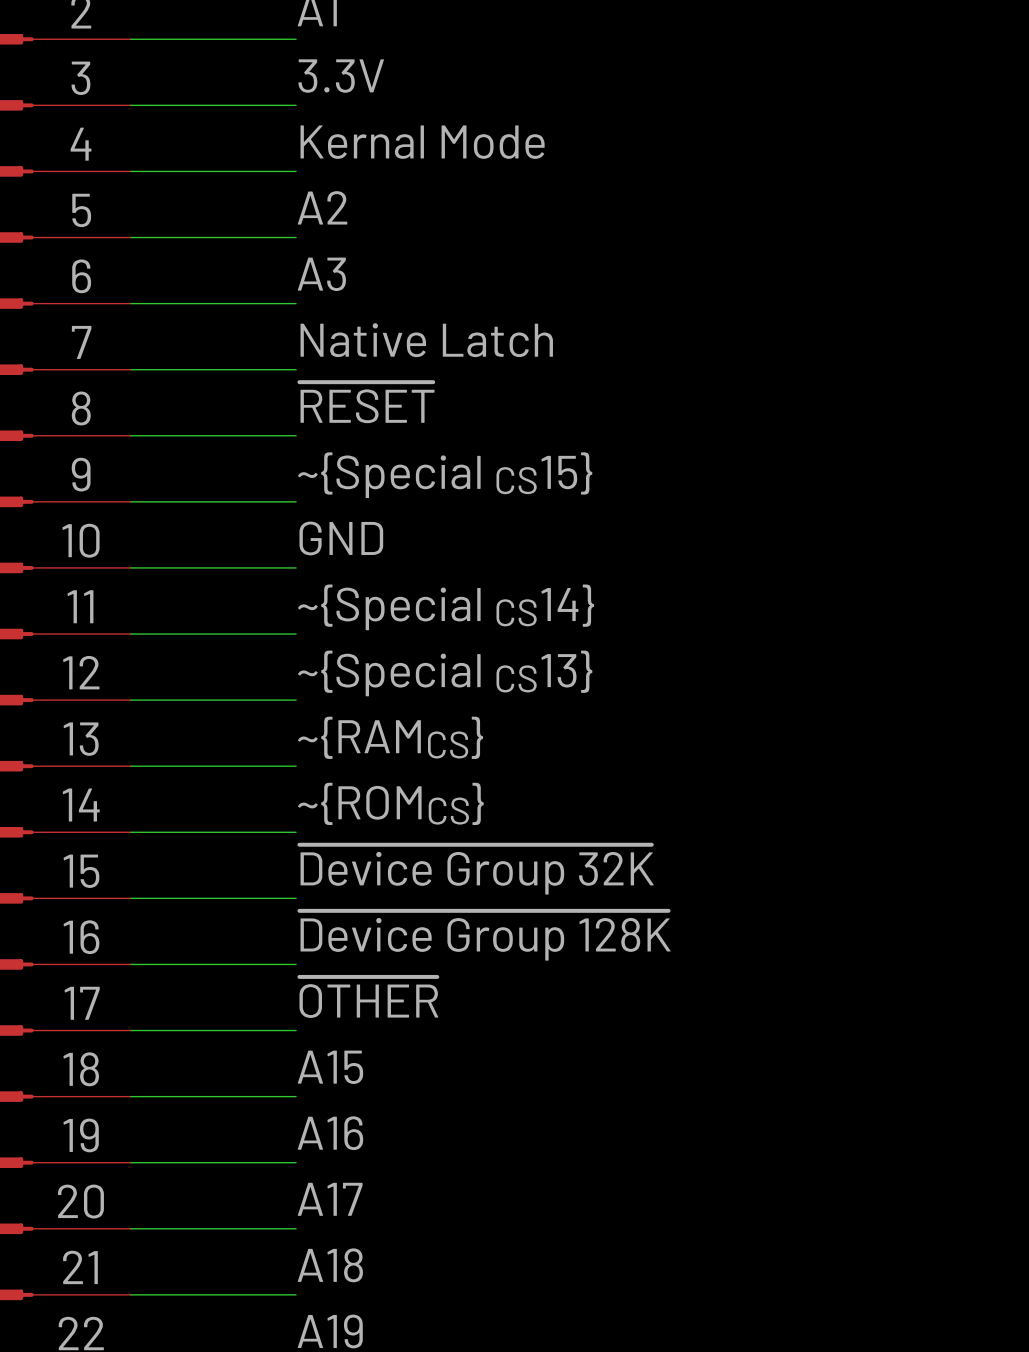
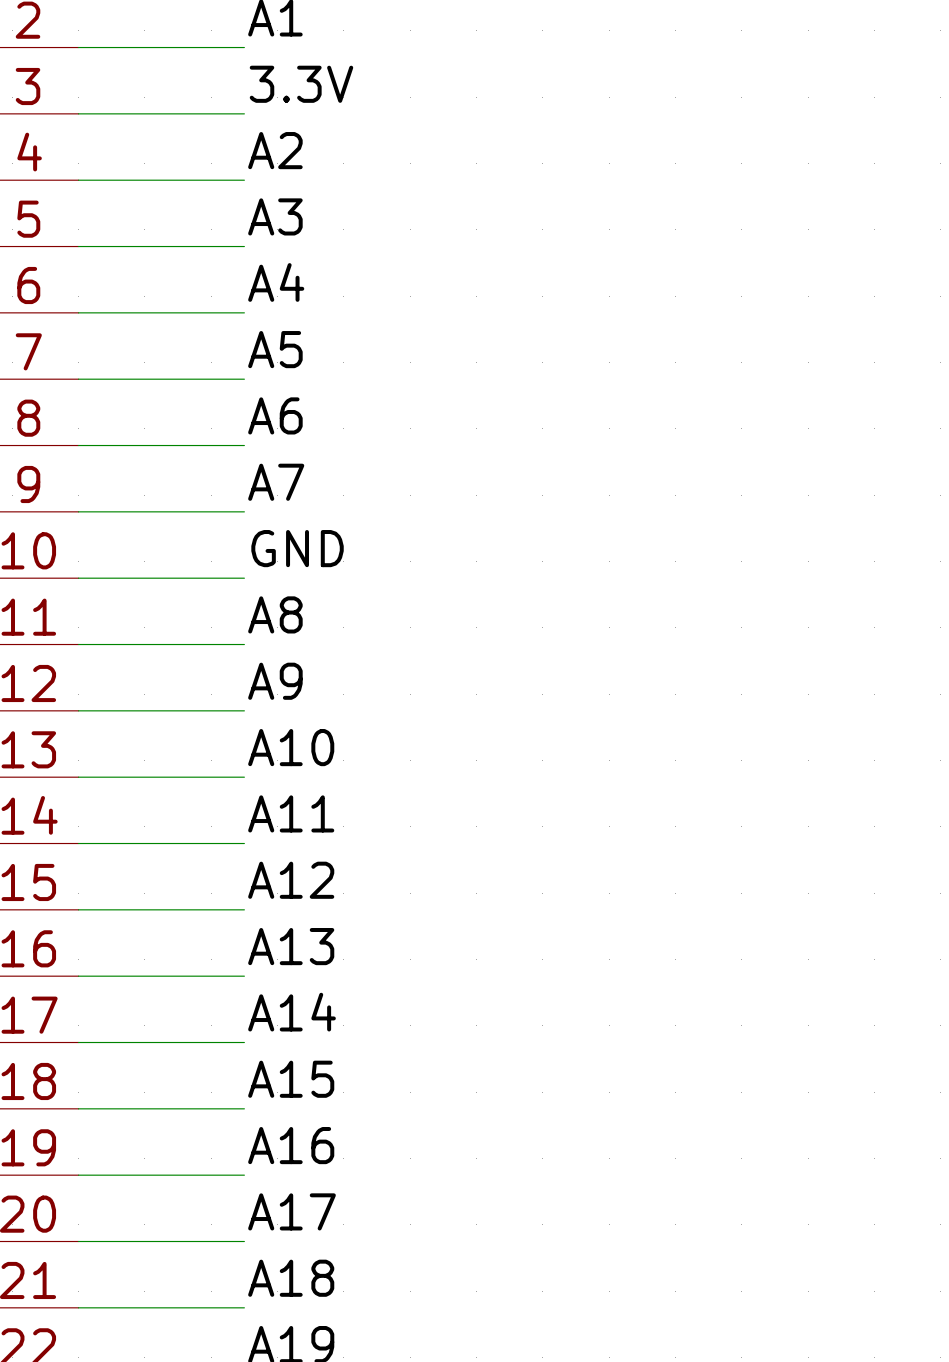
label: Kernal Mode (422, 142) -> A2 (275, 150)
label: A2 (322, 207) -> A3 (275, 216)
label: A3 (321, 274) -> A4 (276, 282)
label: Native Latch (426, 340) -> A5 (275, 349)
label: ~{RESET} (366, 402) -> A6 (275, 415)
label: ~{Special CS15} (445, 475) -> A7 (276, 482)
label: ~{Special CS14} (445, 607) -> A8 (275, 614)
label: ~{Special CS13} (445, 673) -> A9 (275, 681)
label: ~{RAMCS} (390, 737) -> A10 (291, 747)
label: ~{ROMCS} (390, 803) -> A11 (291, 813)
label: ~{Device Group 32K} (476, 869) -> A12 (291, 880)
label: ~{Device Group 128K} (485, 935) -> A13 (291, 946)
label: ~{OTHER} (368, 997) -> A14 (292, 1012)

